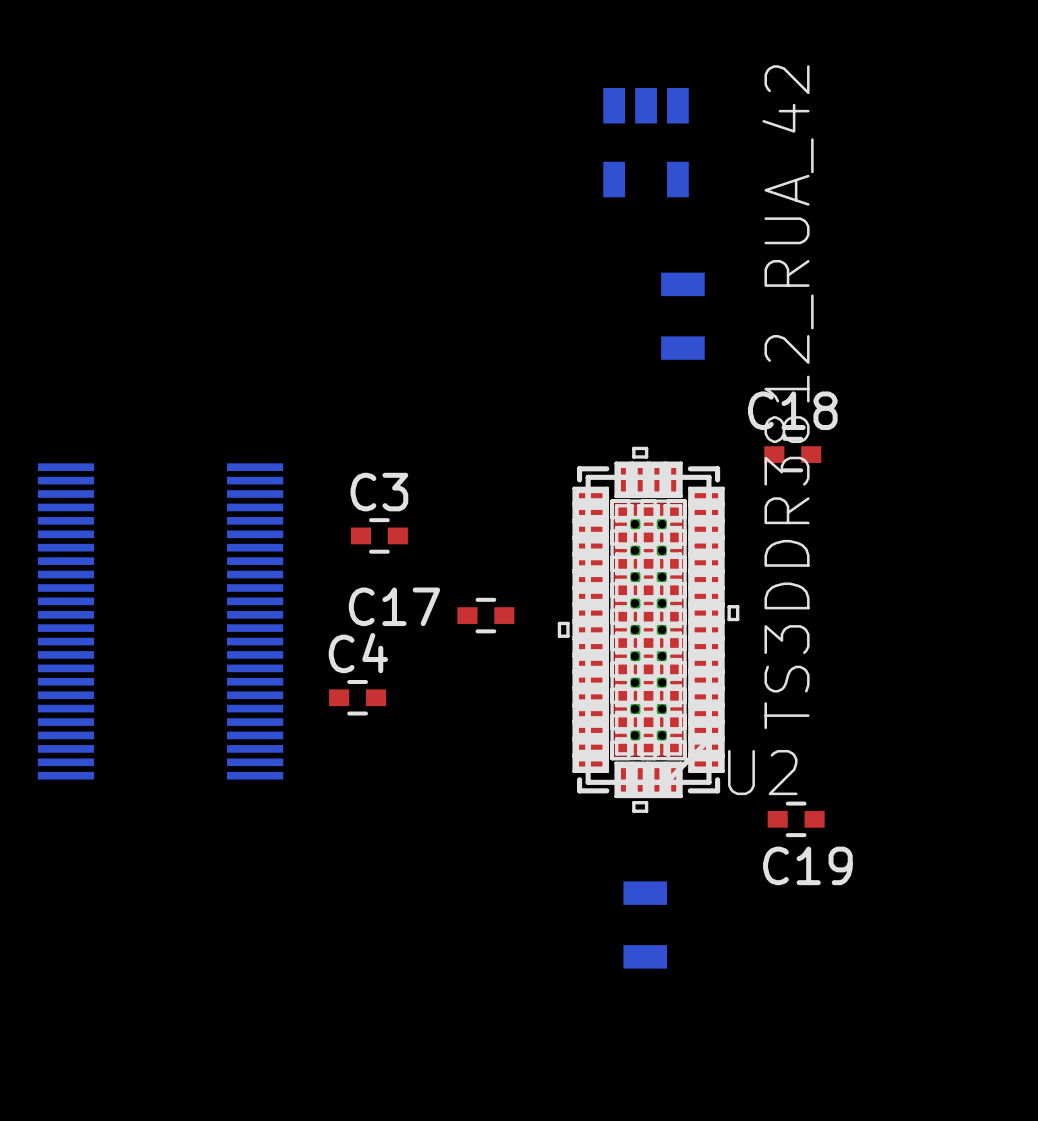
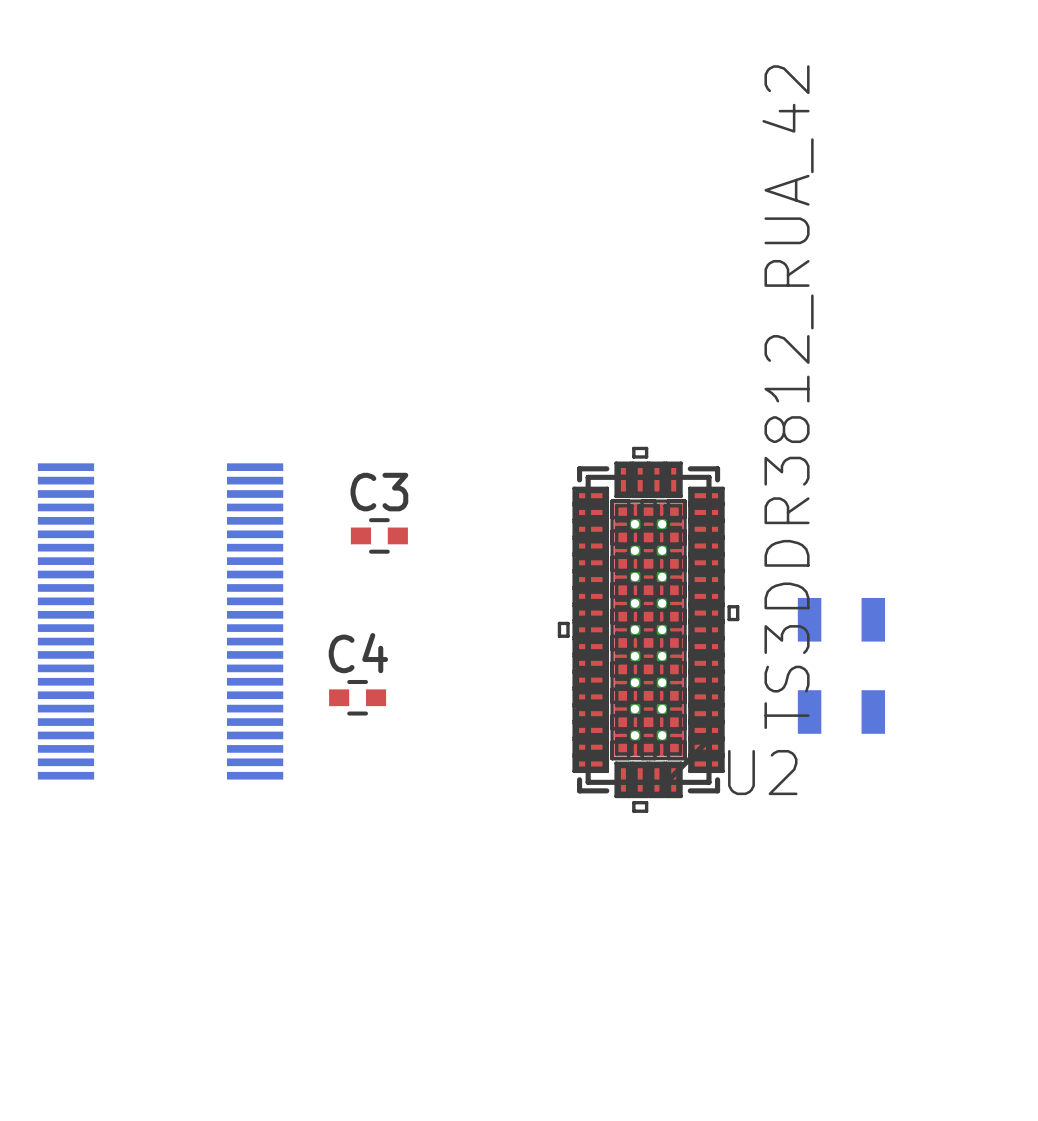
part: (646, 142) -> none
part: (682, 316) -> none
C18: (792, 454) -> none
C17: (485, 615) -> none
part: none -> (841, 619)
part: none -> (841, 712)
C19: (796, 819) -> none
part: (645, 925) -> none

